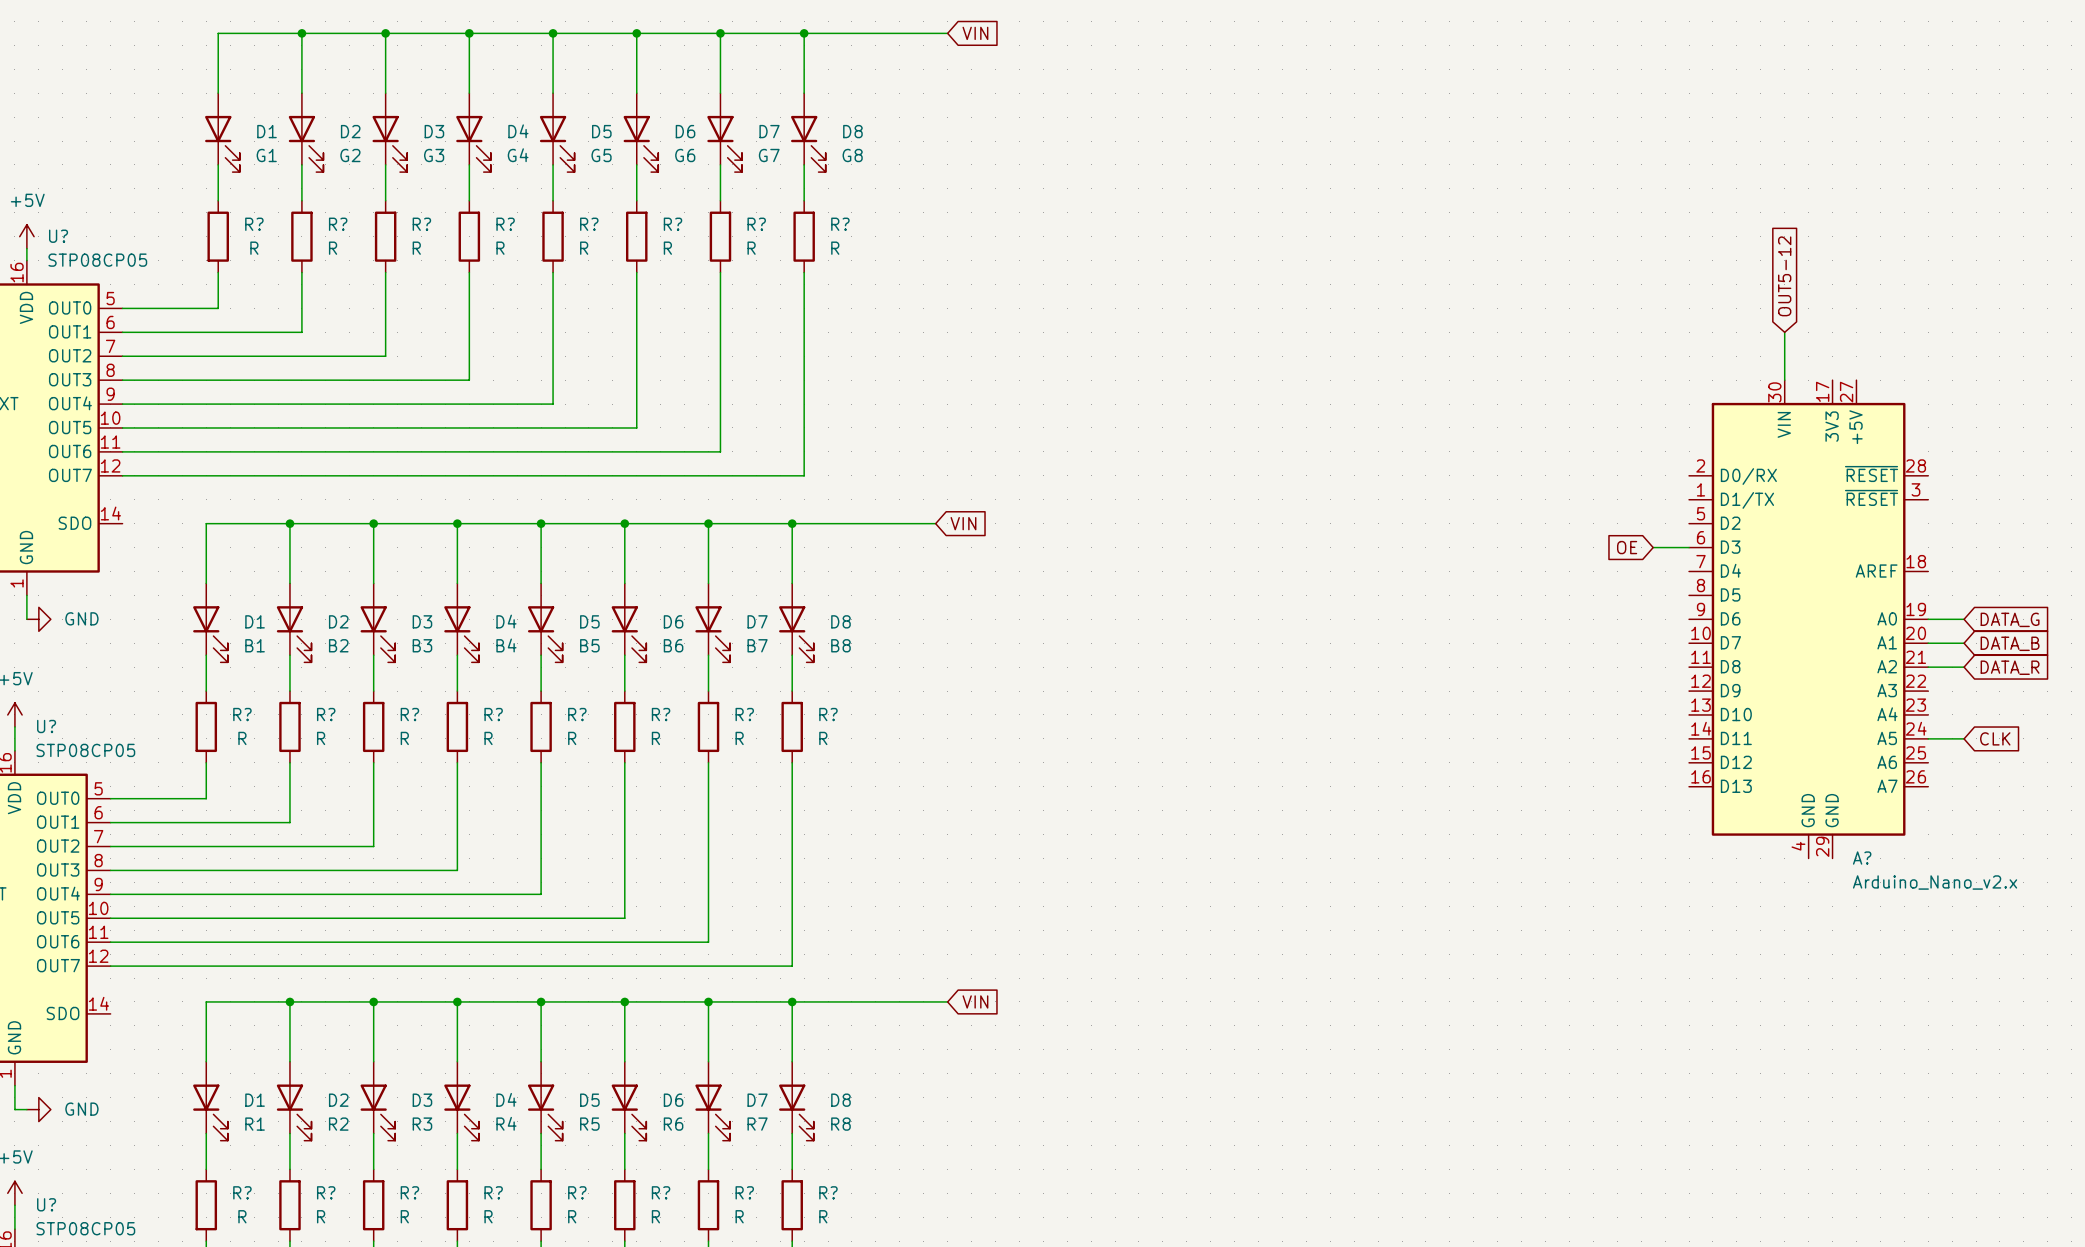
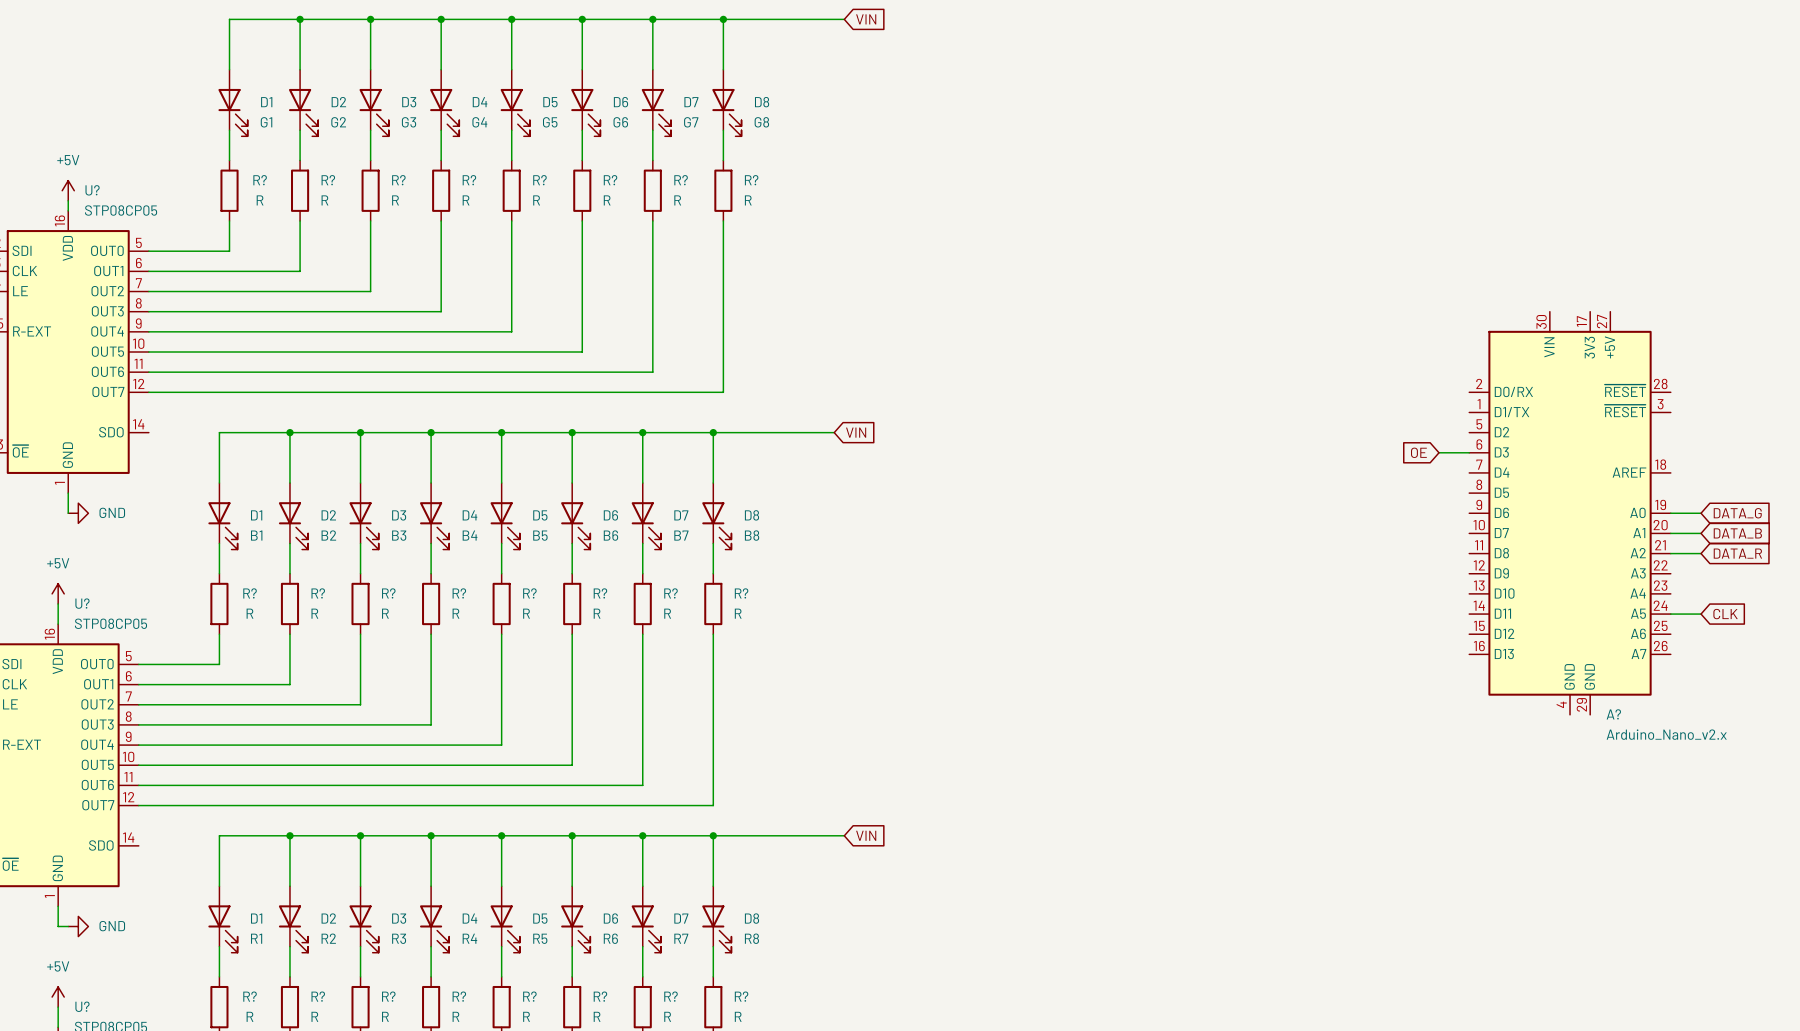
global label: OUT5-12 (1784, 276) -> none
wire: (1784, 332) (1784, 380) -> none

